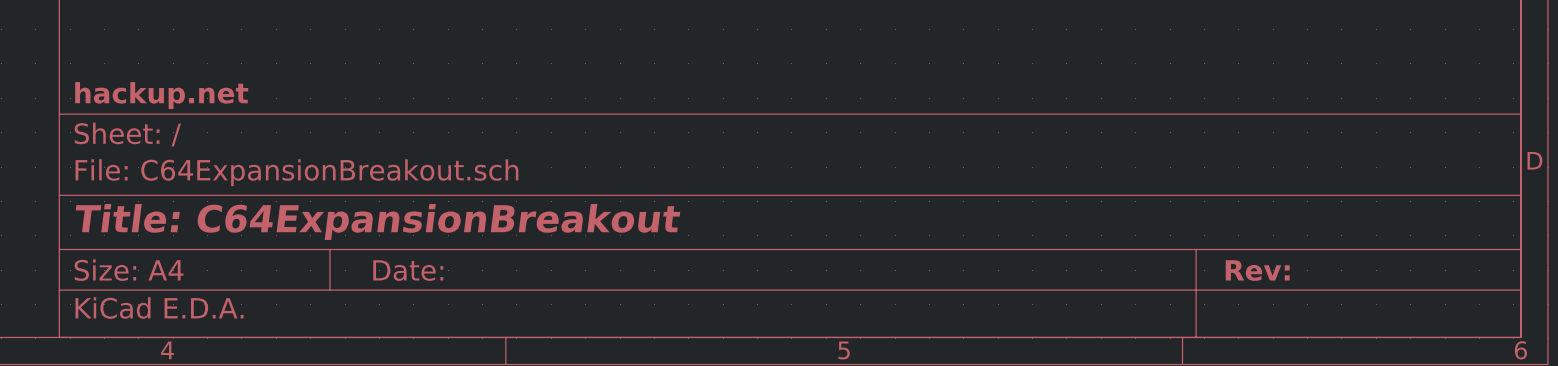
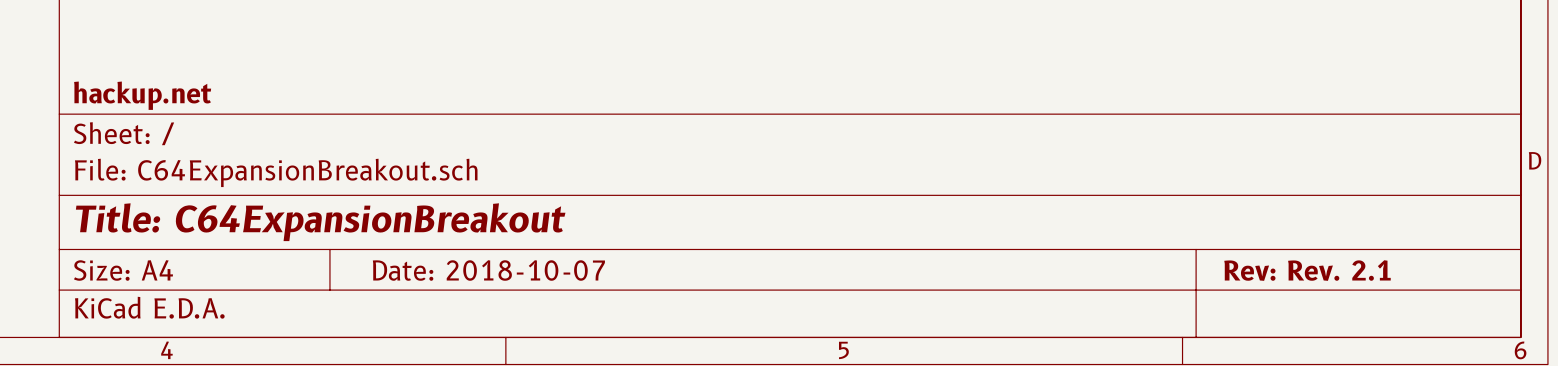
title block: Date: (408, 270) -> Date: 2018-10-07 (488, 270)
title block: Rev: (1257, 270) -> Rev: Rev. 2.1 (1307, 270)

